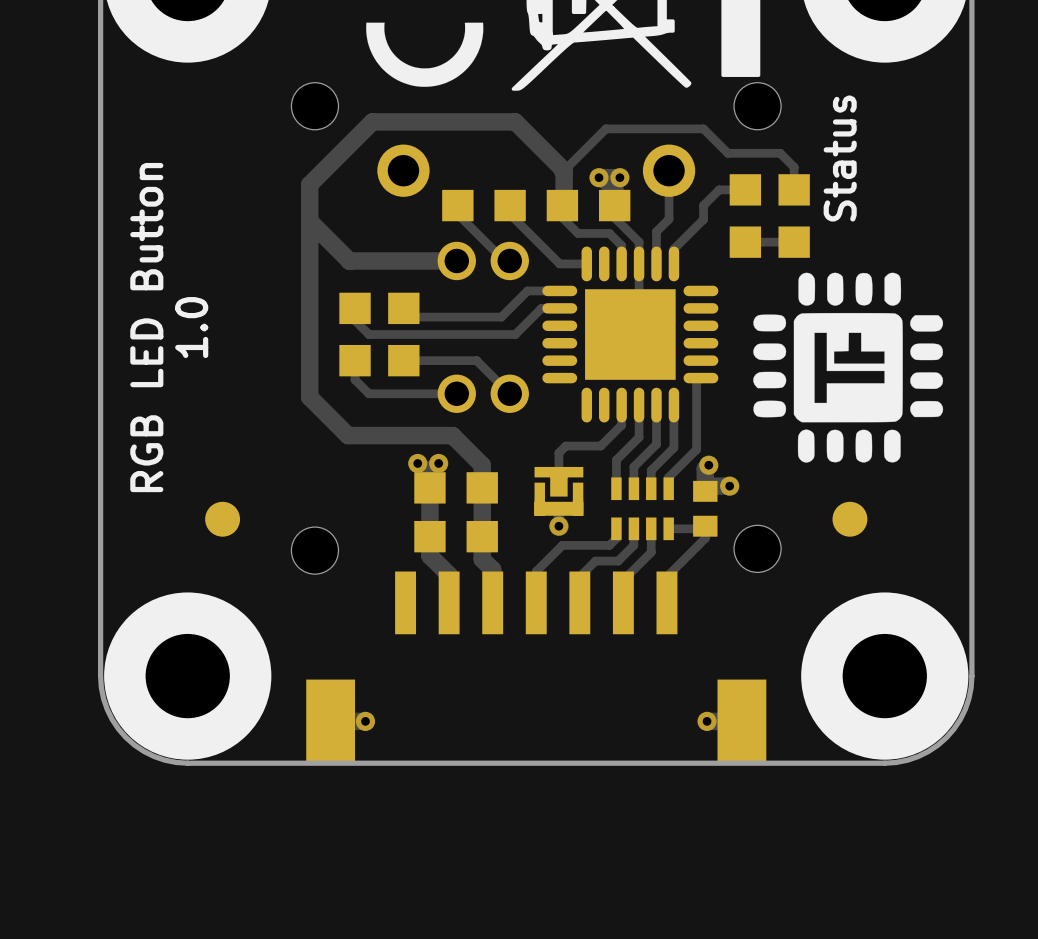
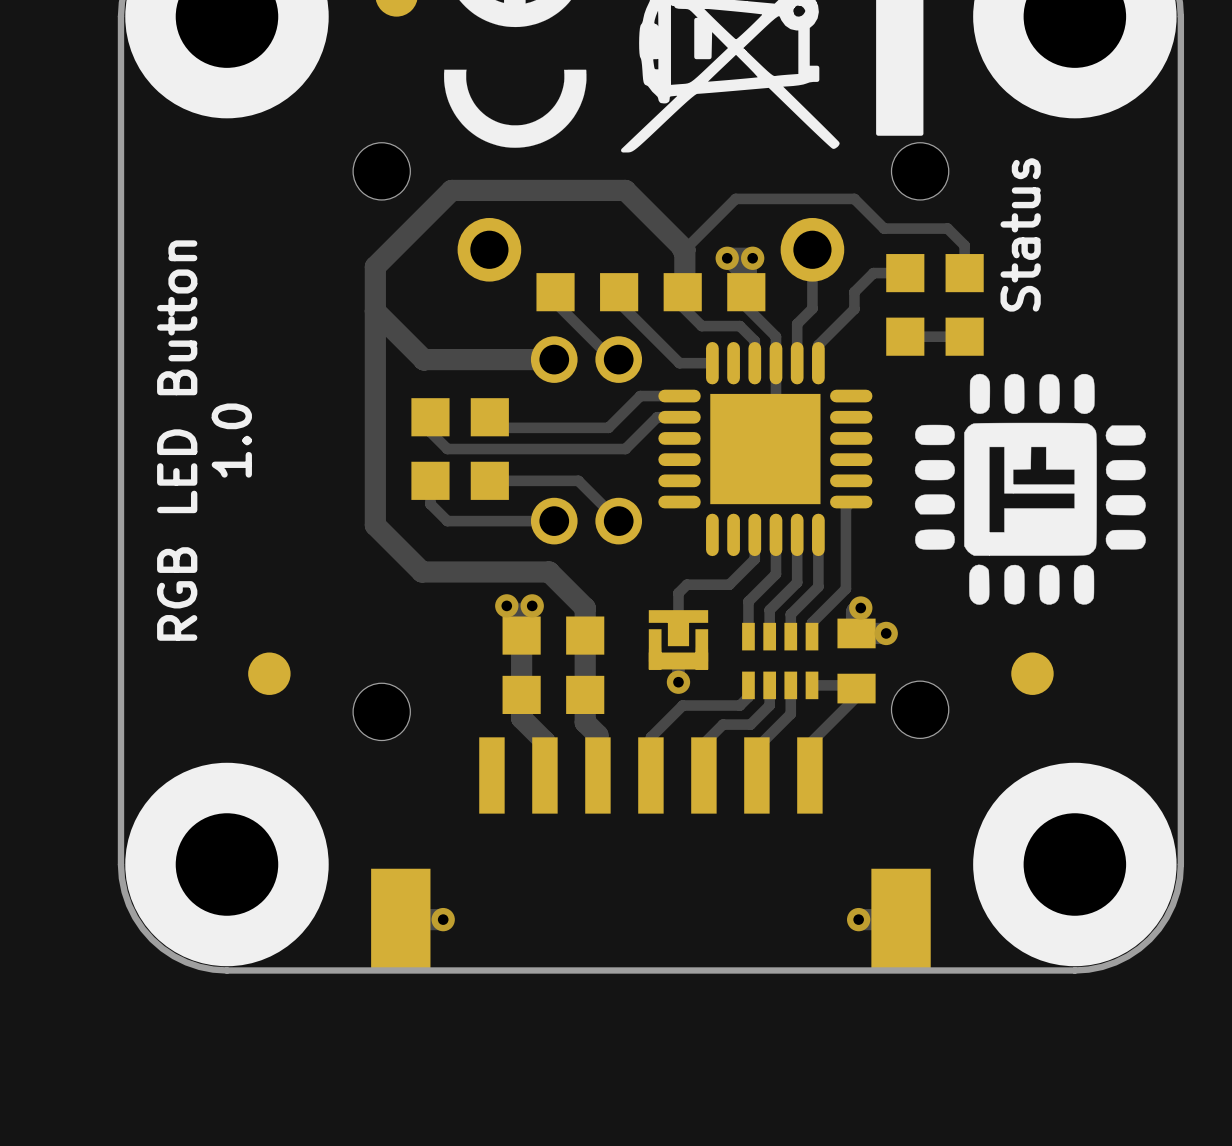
part footprint: [693, 480, 718, 537] -> [837, 618, 876, 704]

